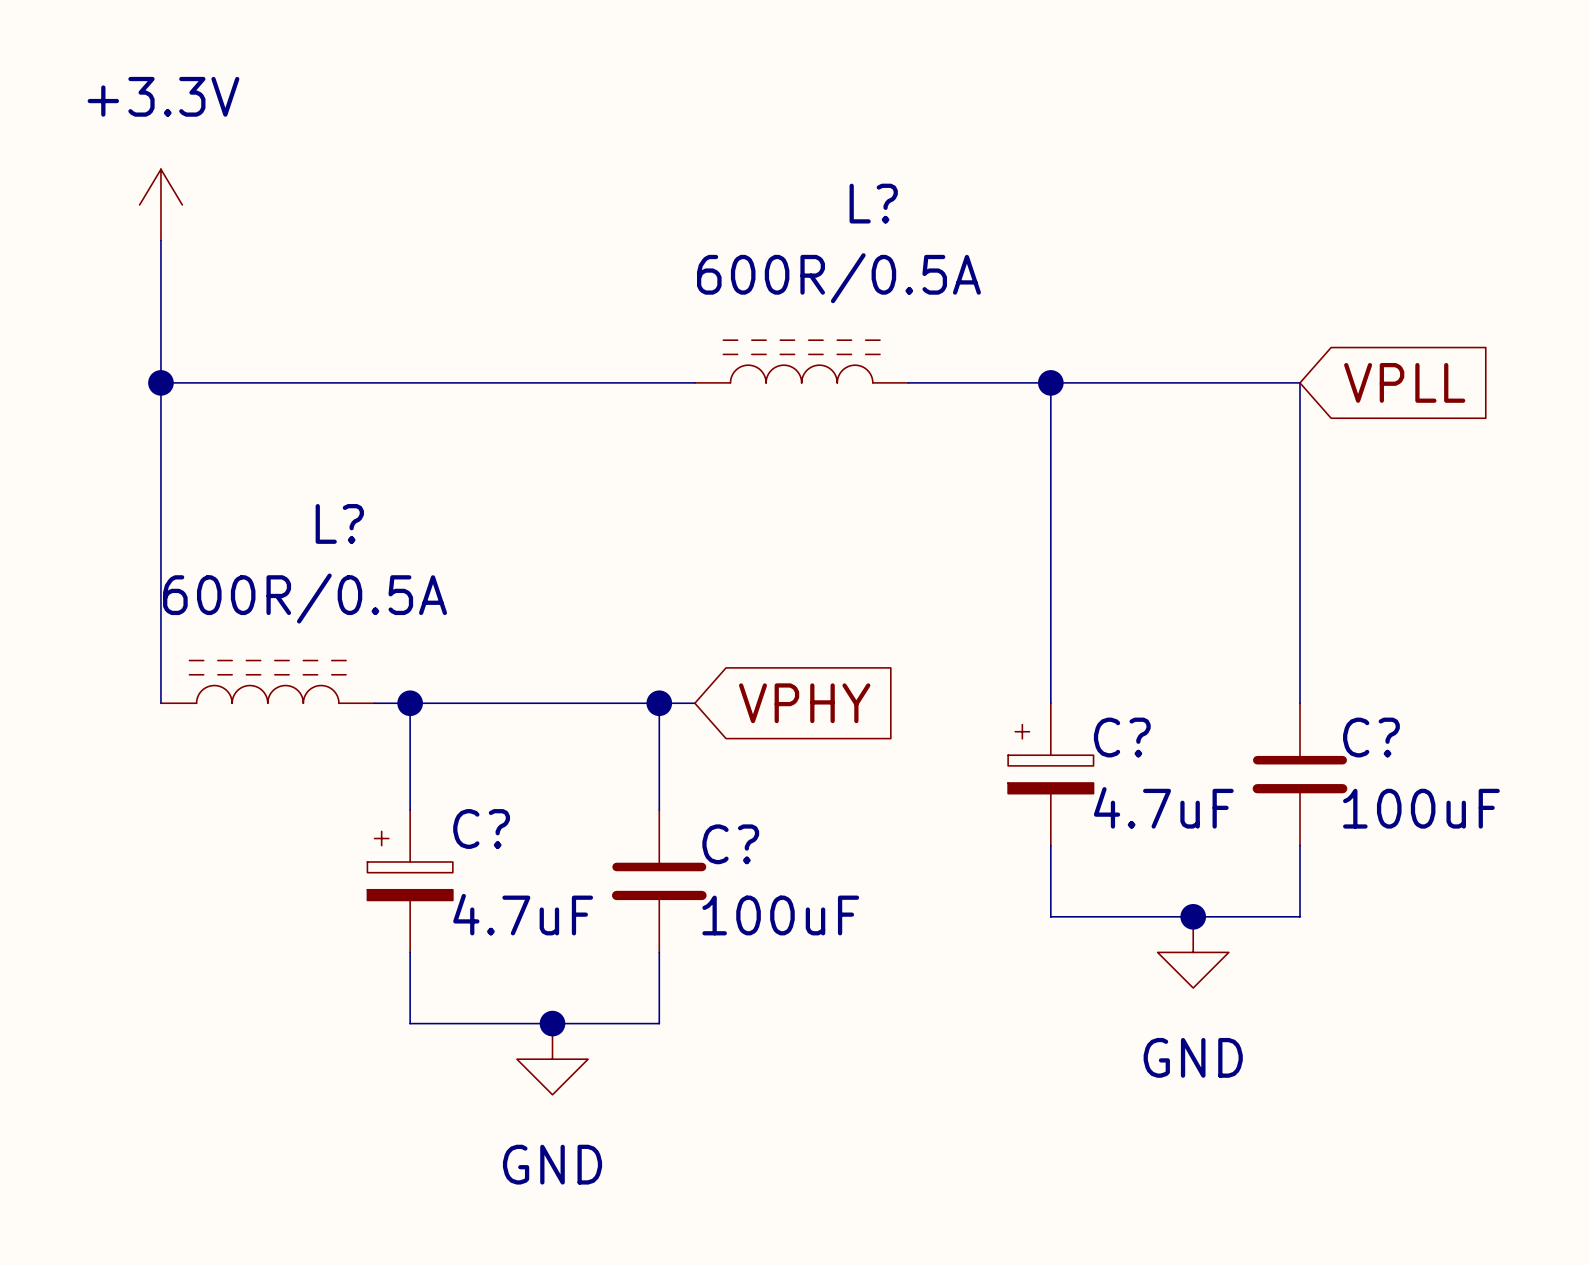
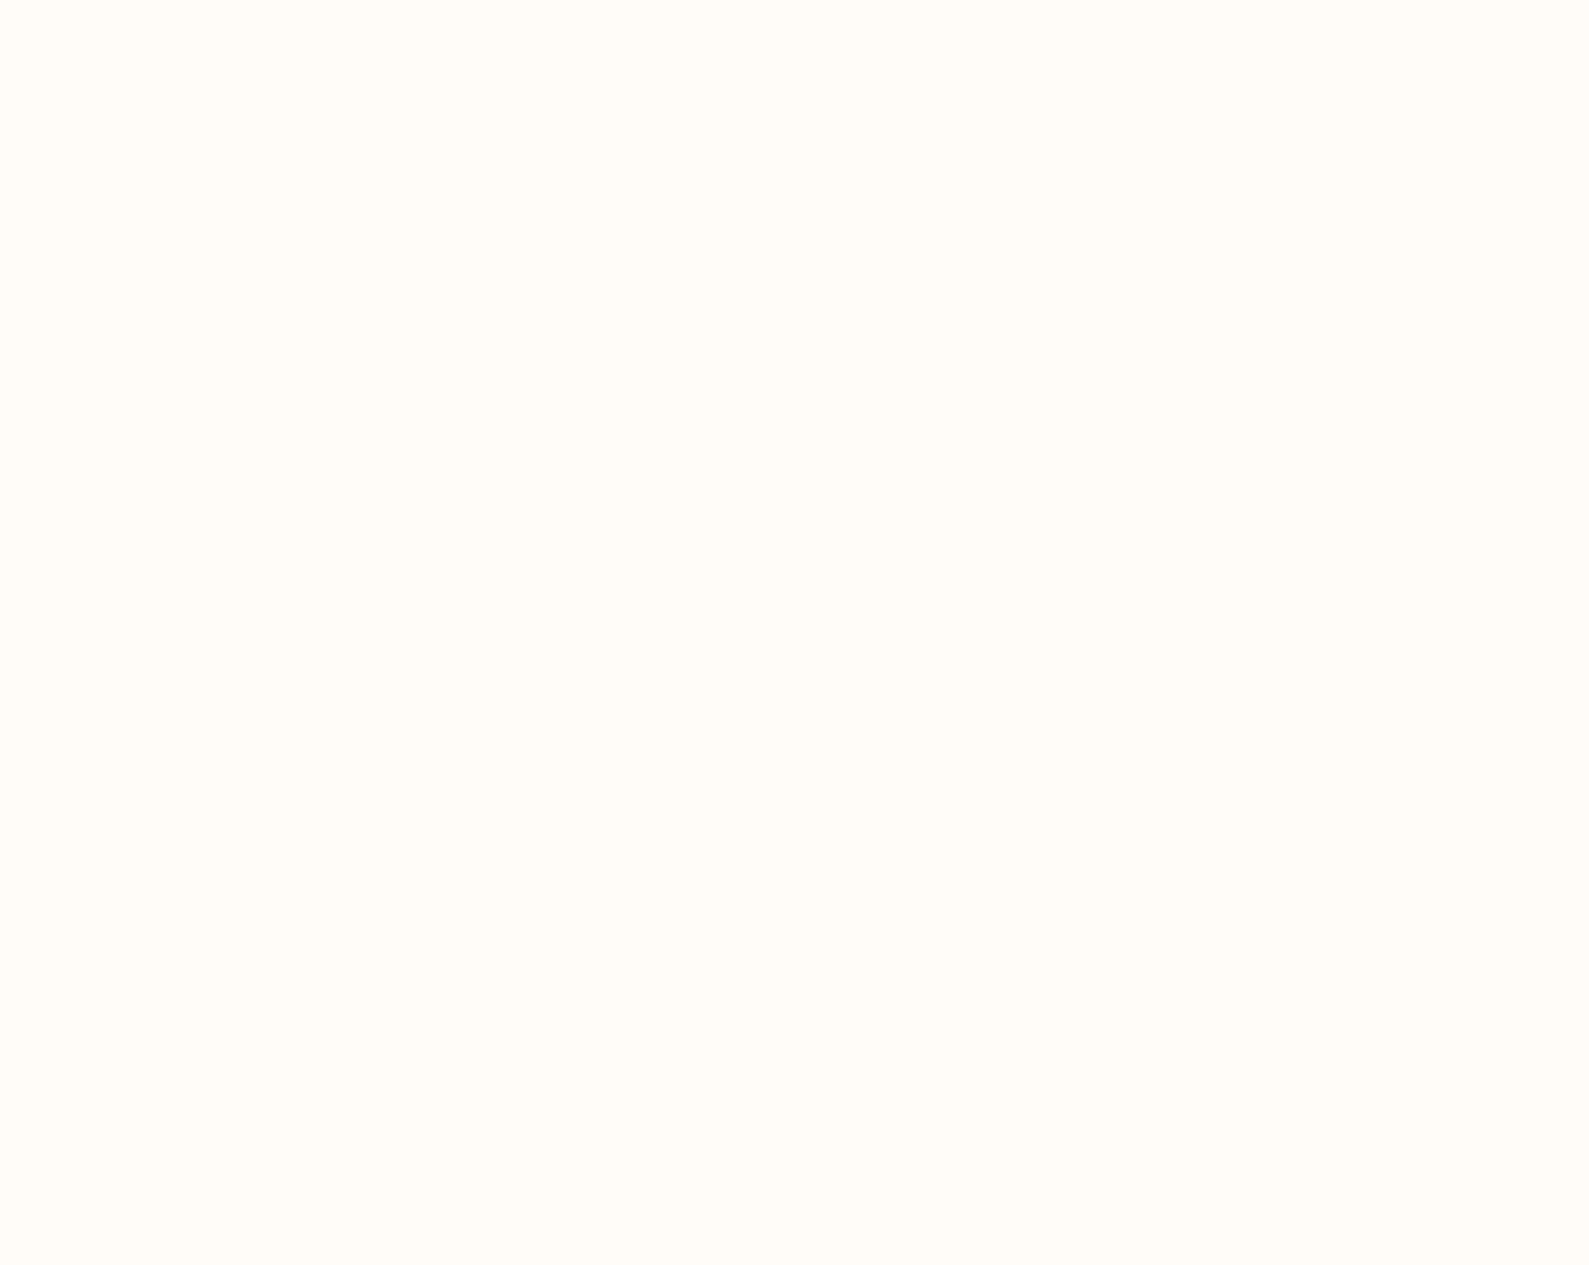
power symbol: +3.3V (160, 204) -> none
wire: (160, 240) (160, 703) -> none
L?: 600R/0.5A (801, 361) -> none
wire: (160, 382) (694, 382) -> none
junction: (160, 382) -> none
wire: (908, 382) (1299, 382) (1299, 703) -> none
wire: (1050, 382) (1050, 703) -> none
junction: (1050, 382) -> none
global label: VPLL (1404, 382) -> none
L?: 600R/0.5A (267, 681) -> none
wire: (374, 703) (694, 703) -> none
wire: (410, 703) (410, 810) -> none
junction: (410, 703) -> none
wire: (659, 703) (659, 810) -> none
junction: (659, 703) -> none
global label: VPHY (804, 703) -> none
C?: 4.7uF (1050, 774) -> none
C?: 100uF (1299, 774) -> none
wire: (1050, 845) (1050, 916) (1299, 916) (1299, 845) -> none
C?: 4.7uF (410, 881) -> none
C?: 100uF (659, 881) -> none
junction: (1193, 916) -> none
wire: (410, 952) (410, 1023) (659, 1023) (659, 952) -> none
power symbol: GND (1193, 952) -> none
junction: (552, 1023) -> none
power symbol: GND (552, 1059) -> none

